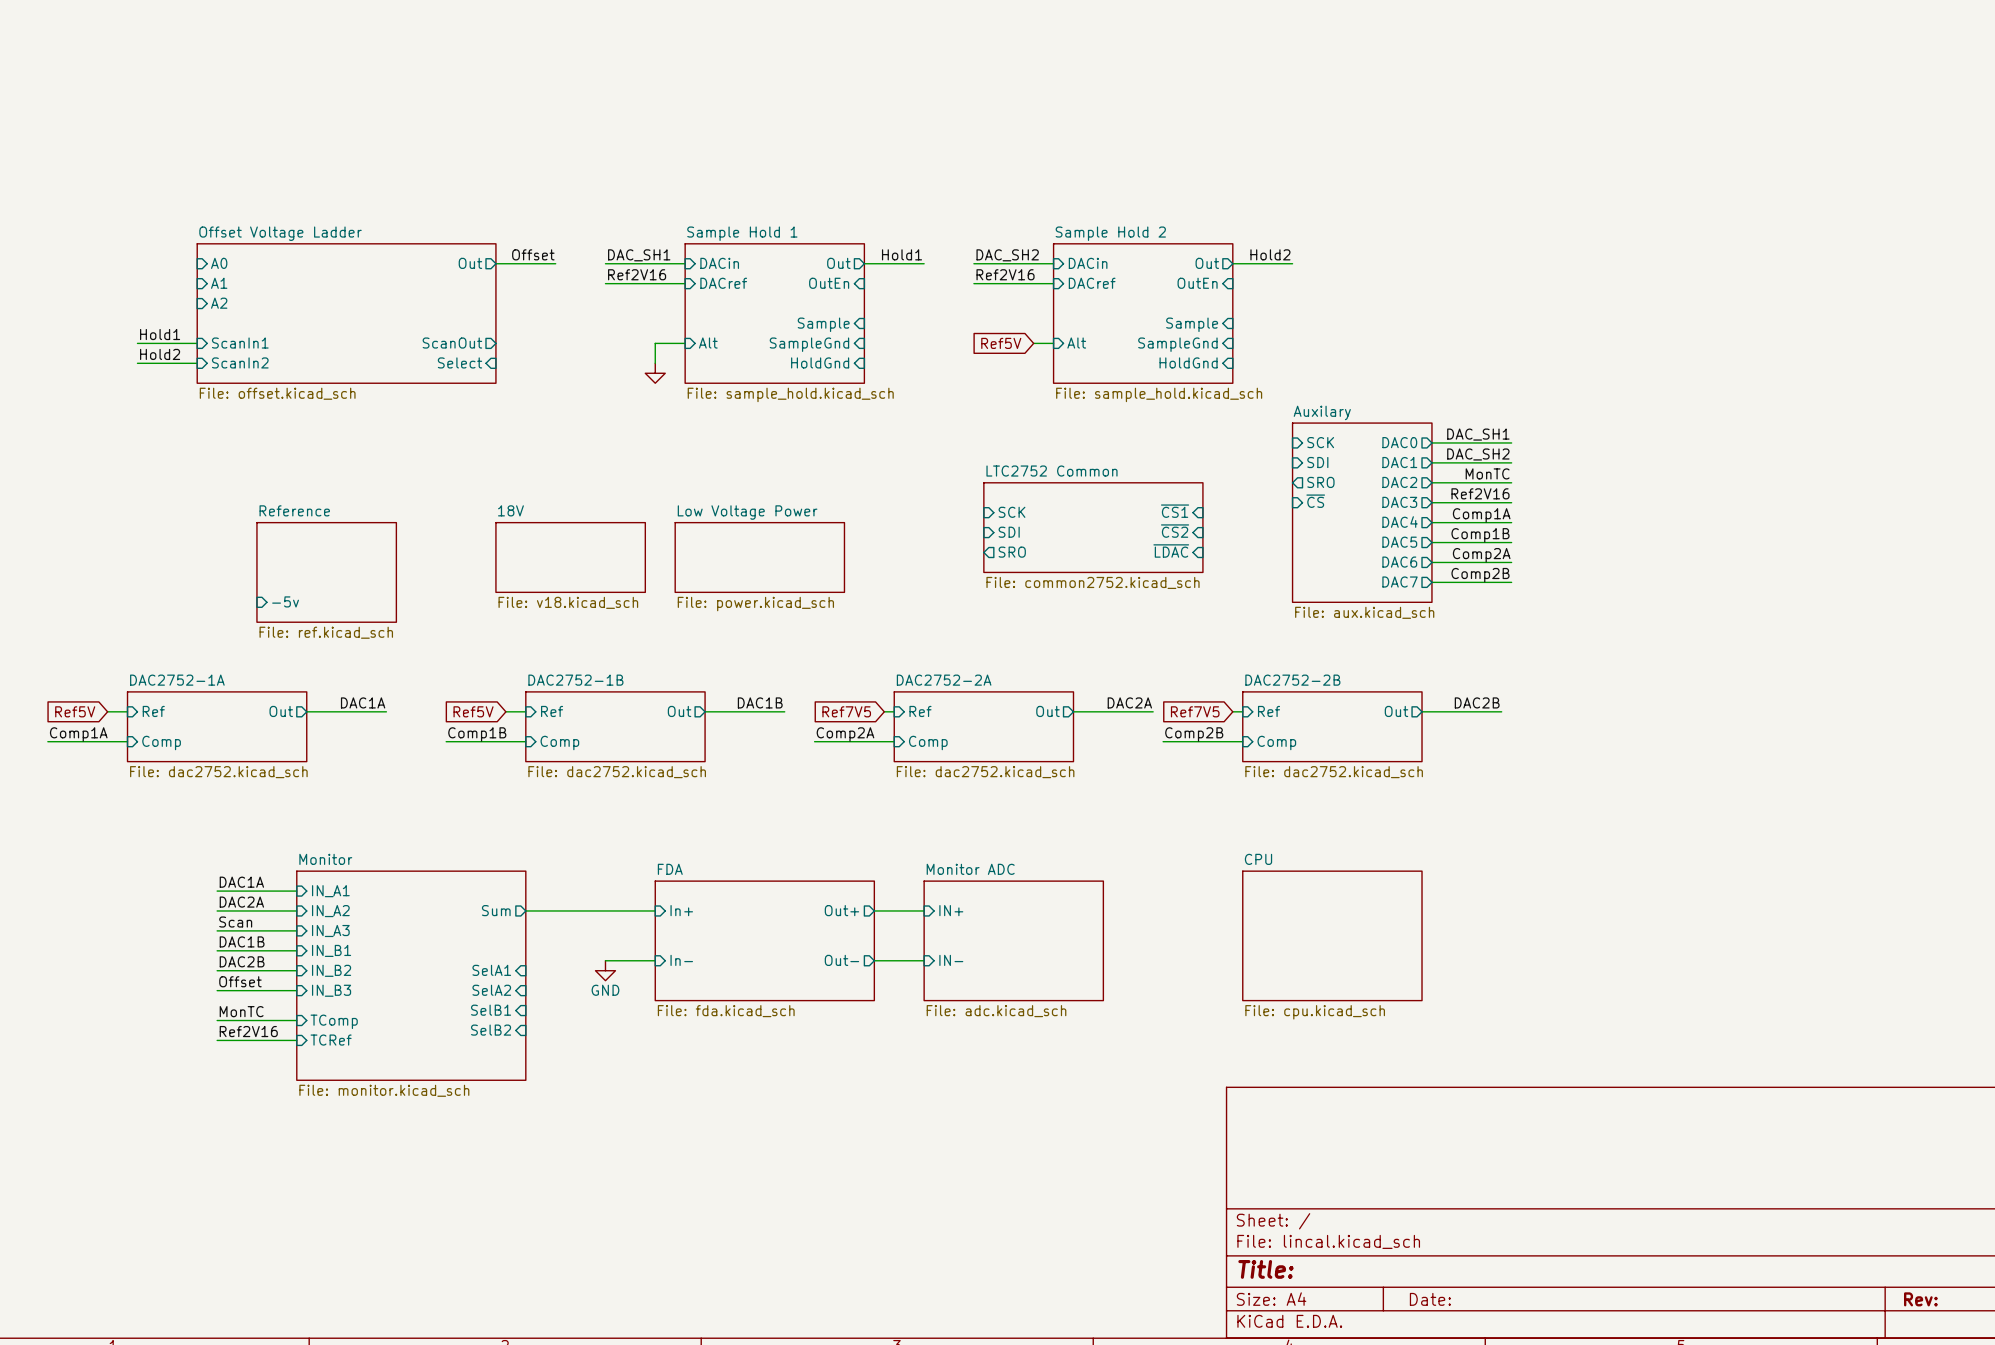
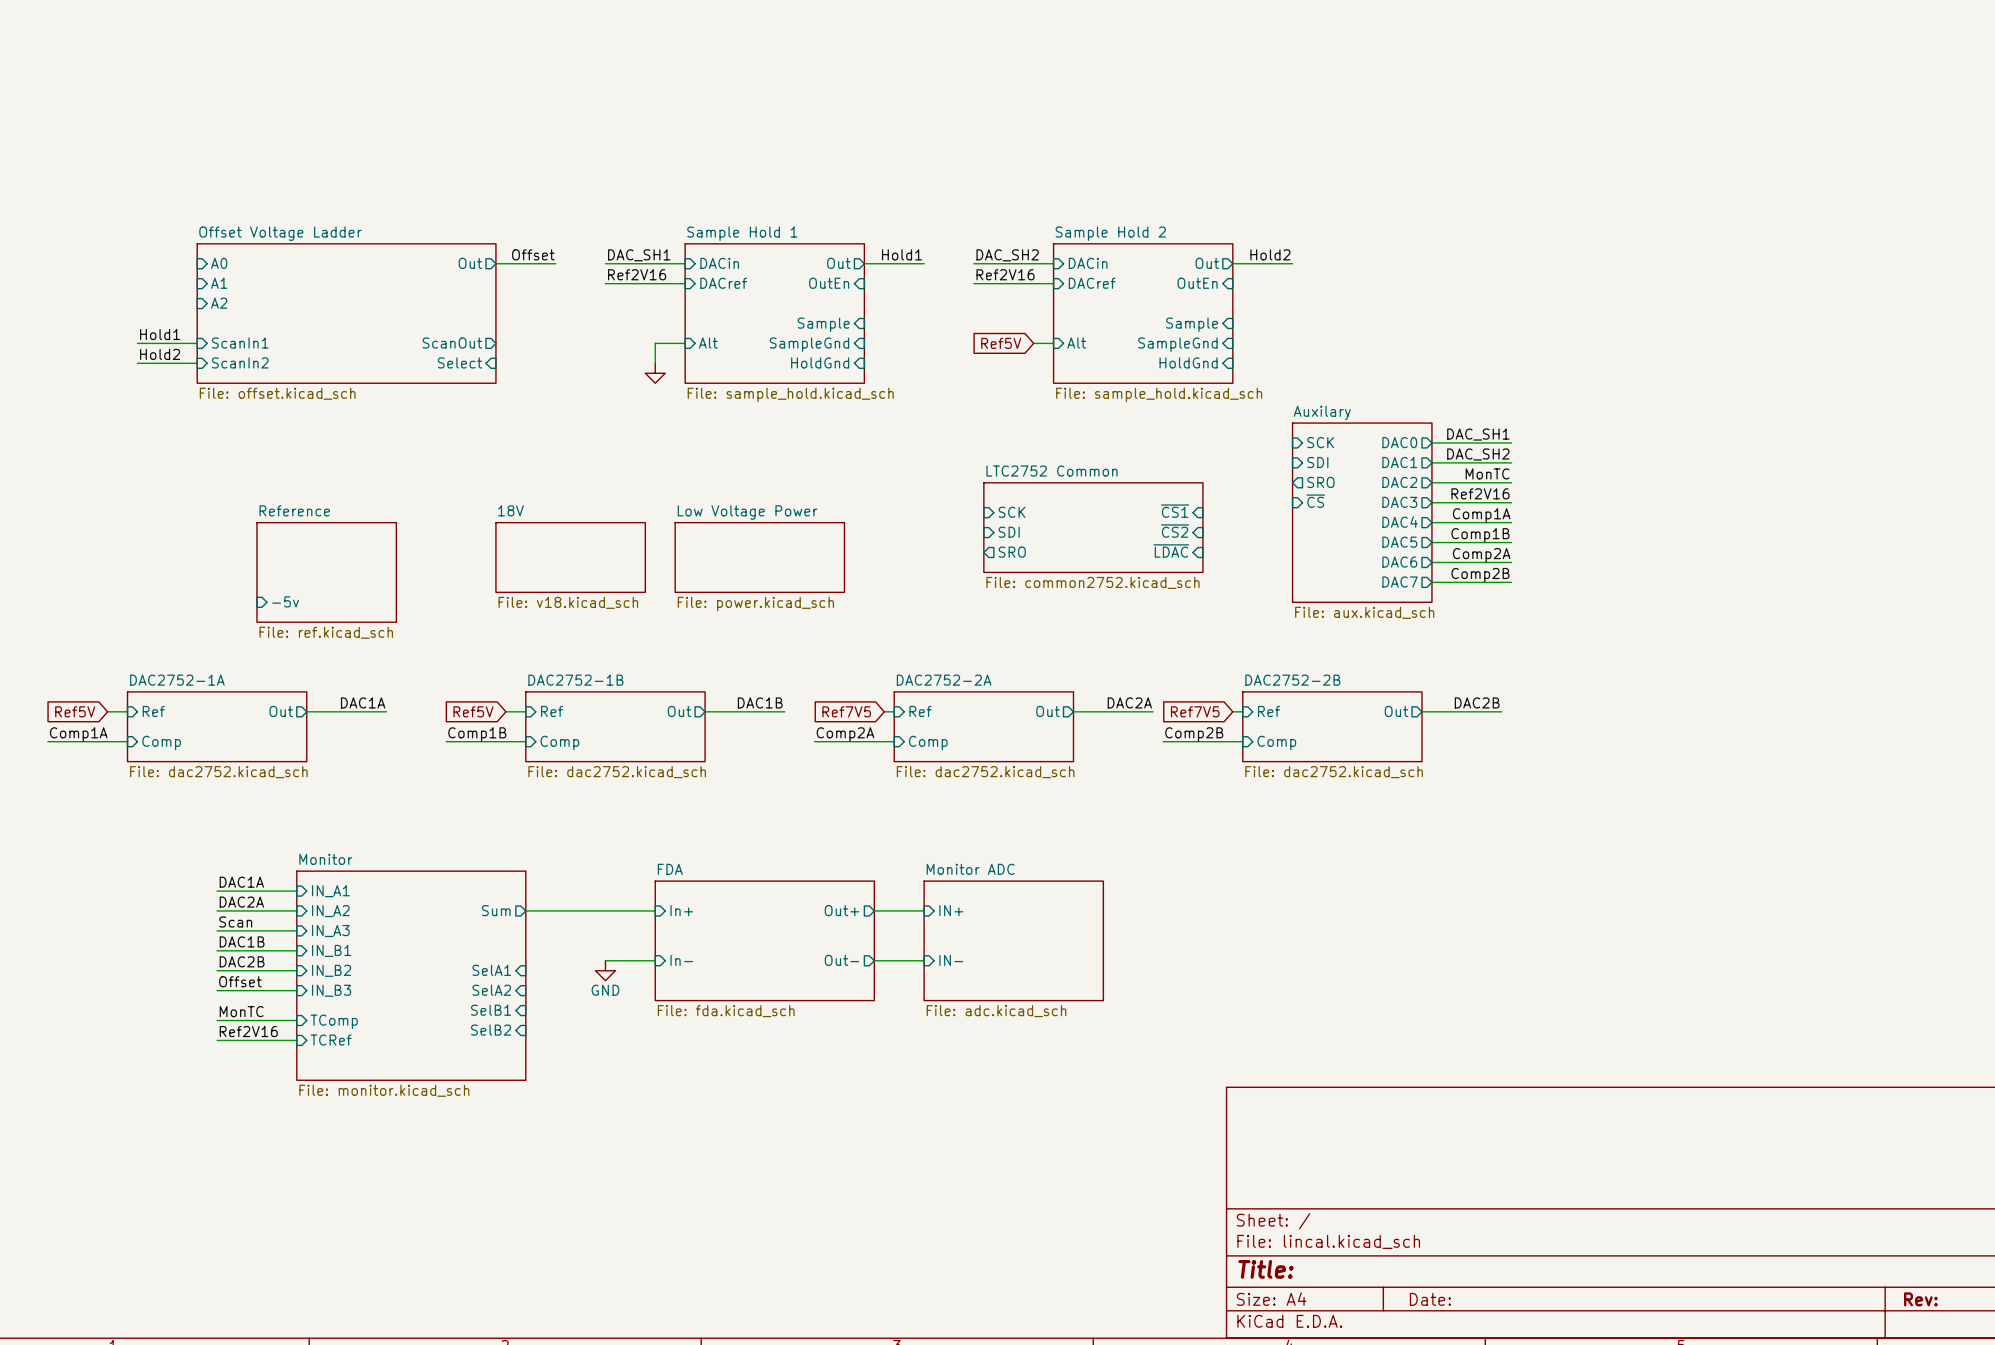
sheet CPU: File: cpu.kicad_sch (1332, 935) -> none

